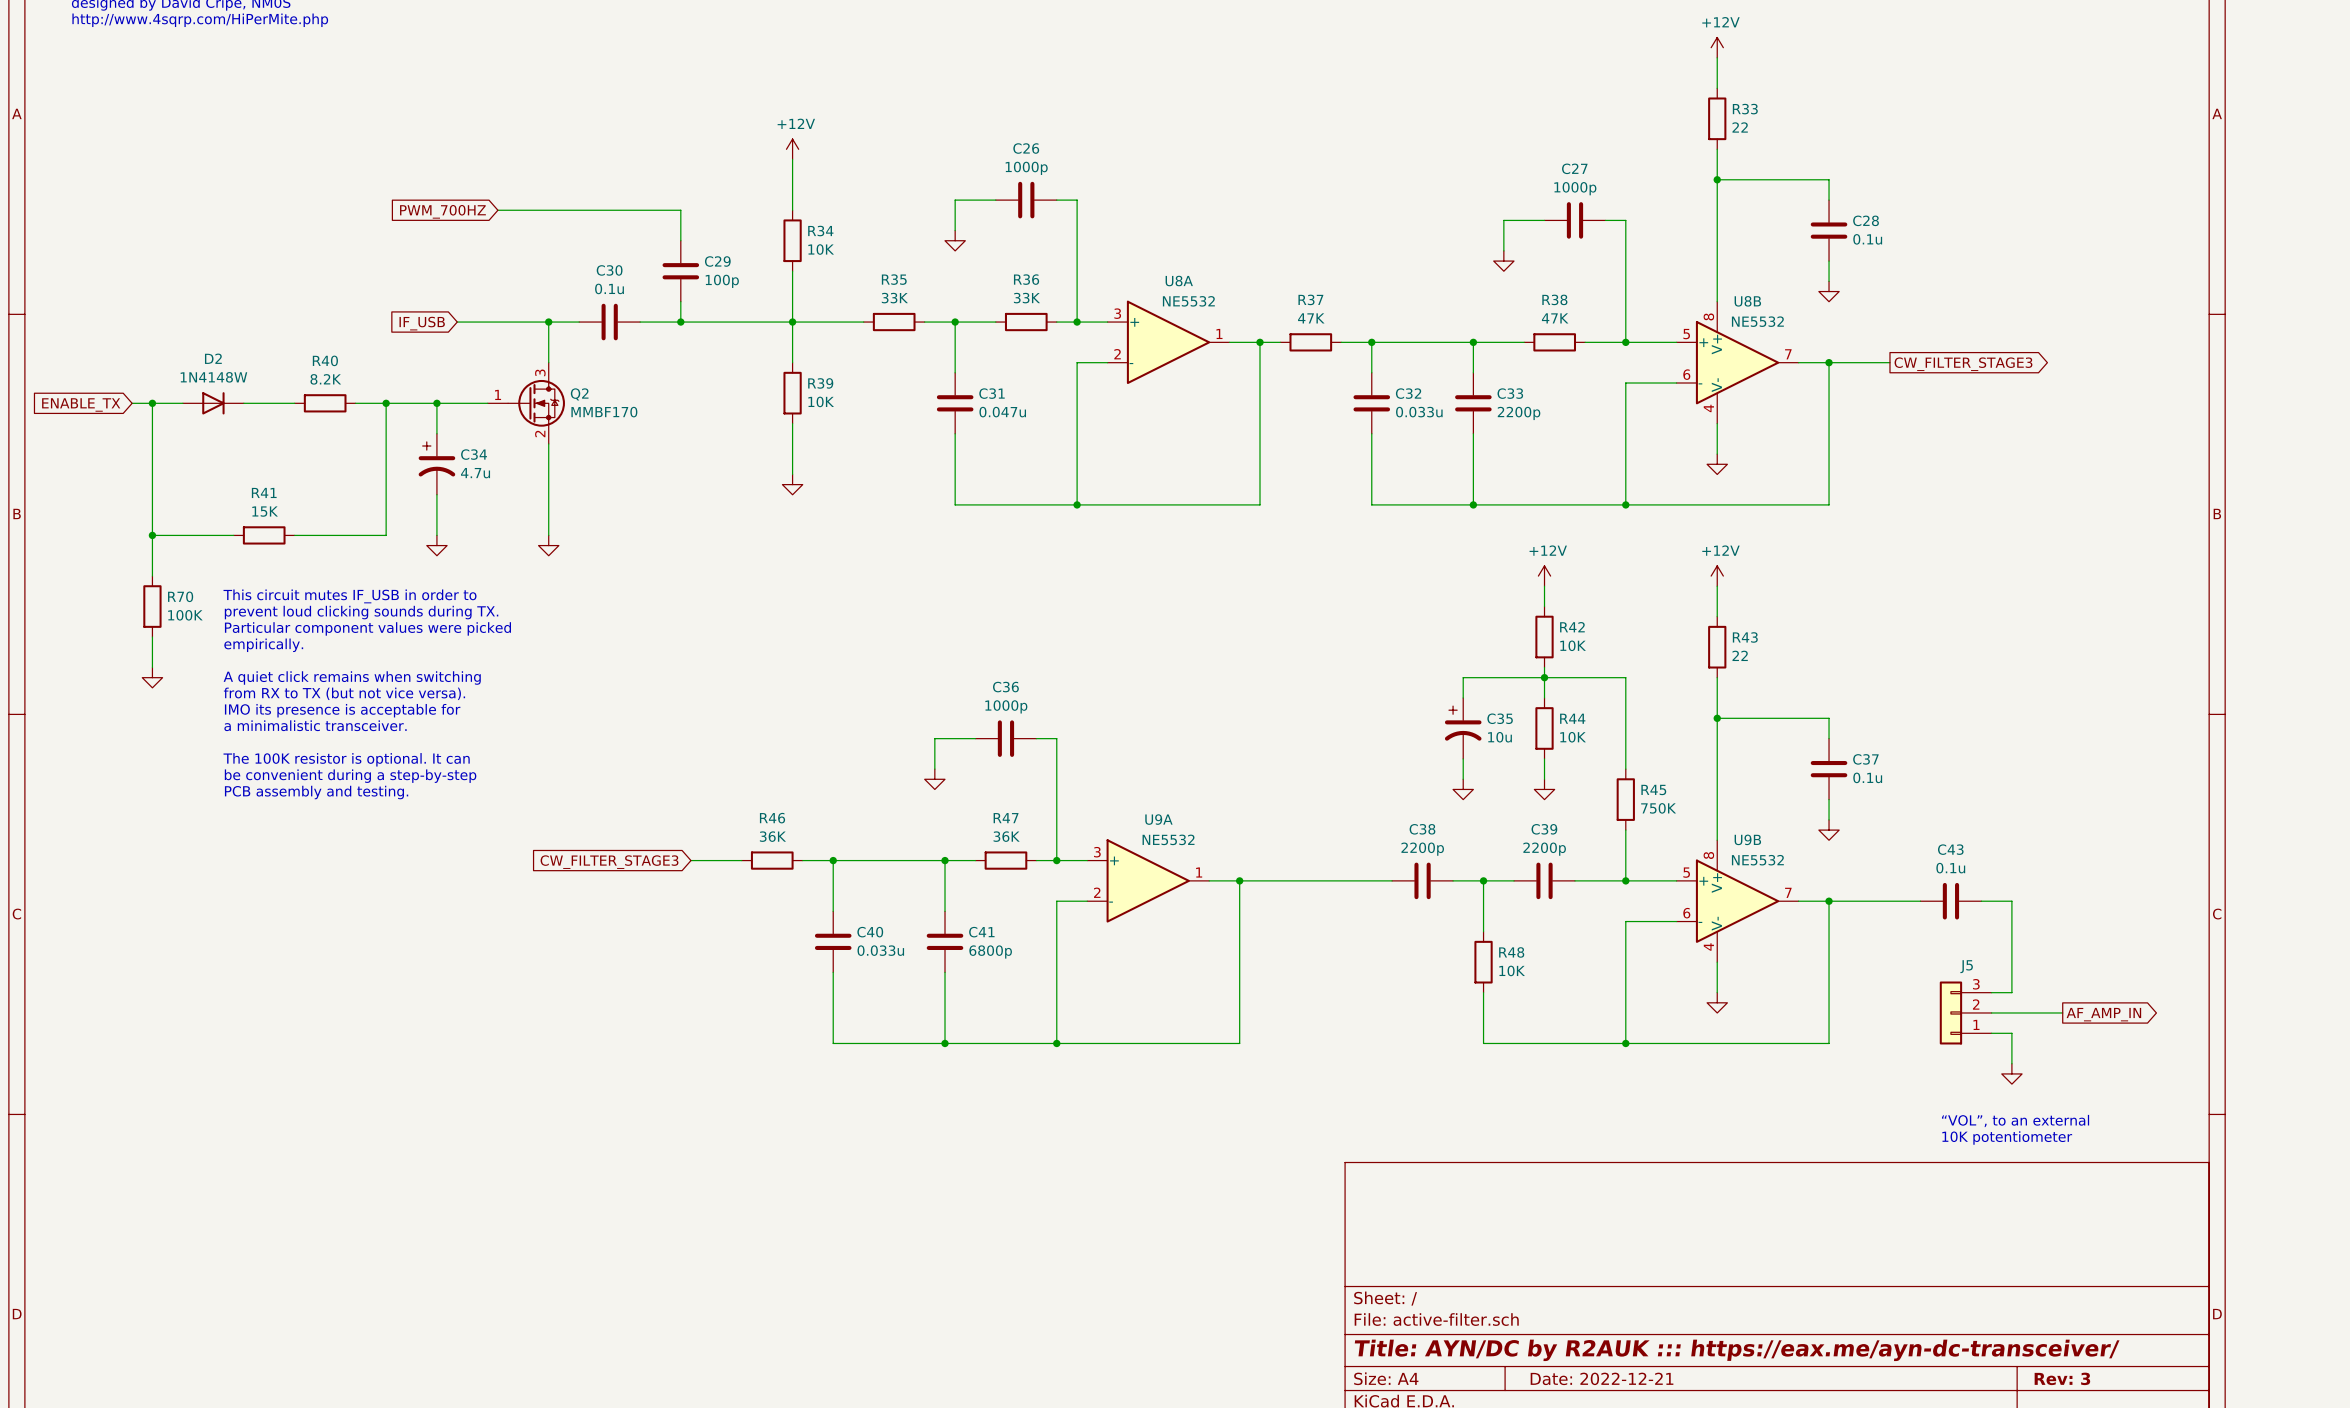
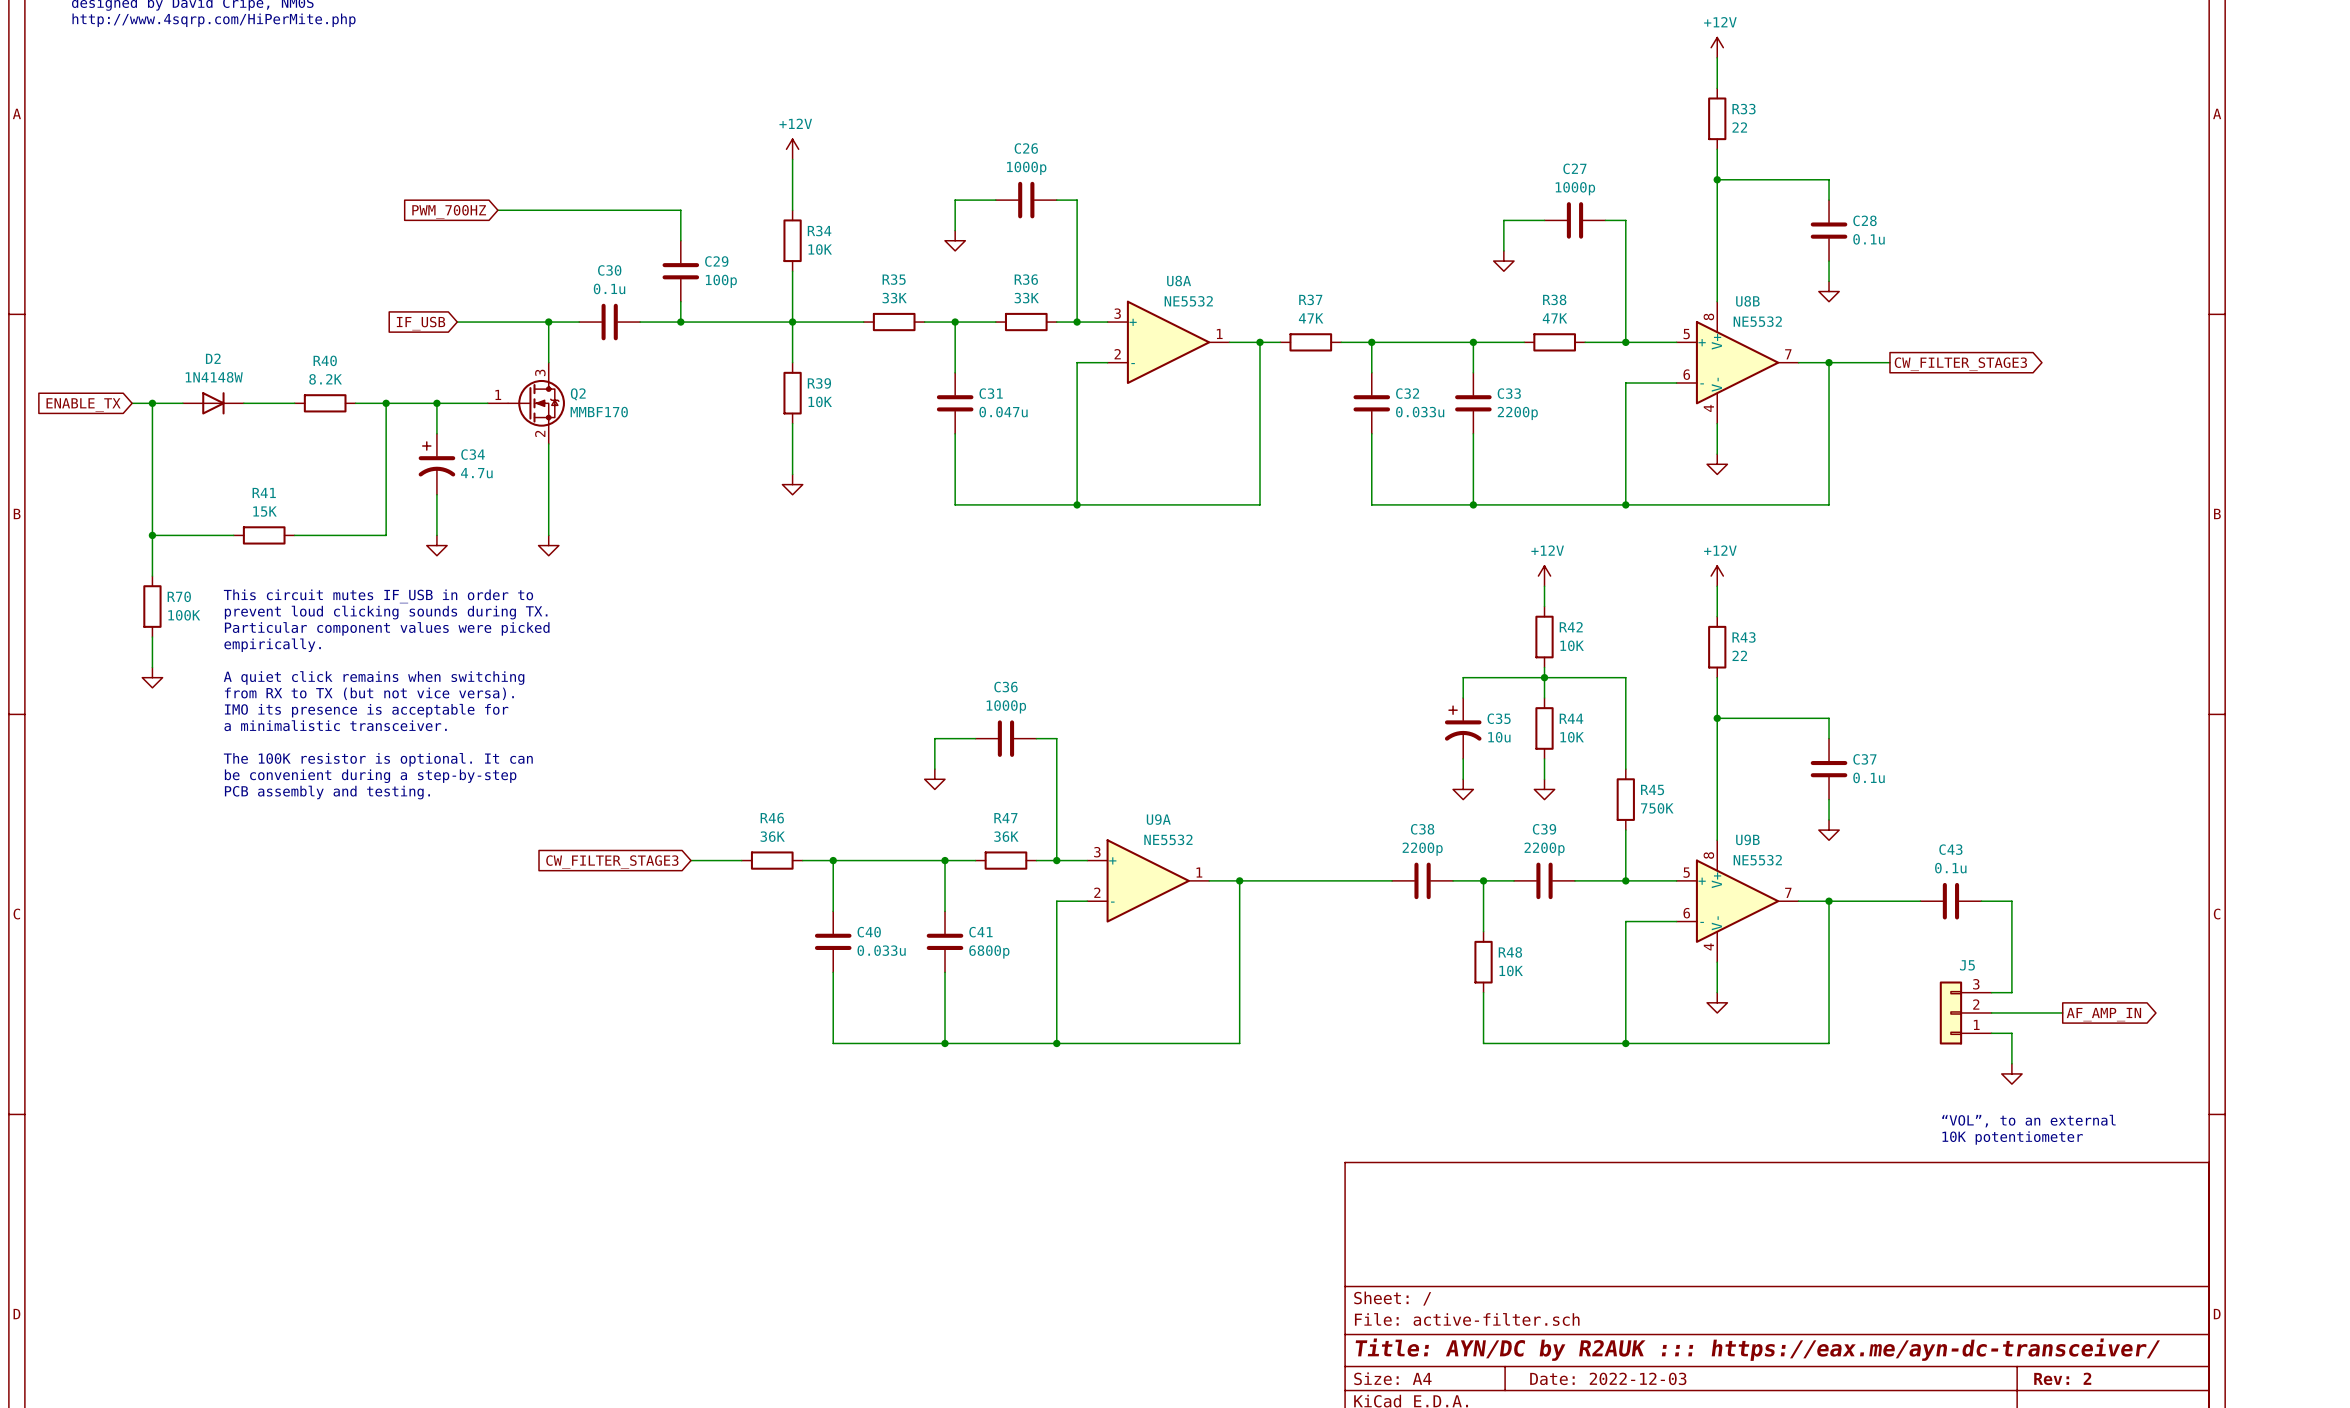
title block: Date: 2022-12-21 (1602, 1378) -> Date: 2022-12-03 (1608, 1378)
title block: Rev: 3 (2062, 1378) -> Rev: 2 (2062, 1378)

